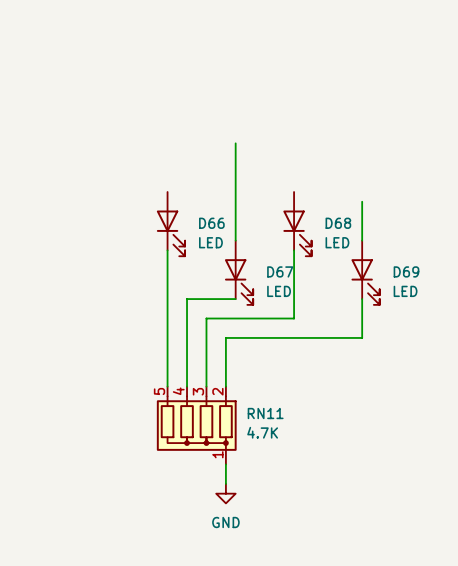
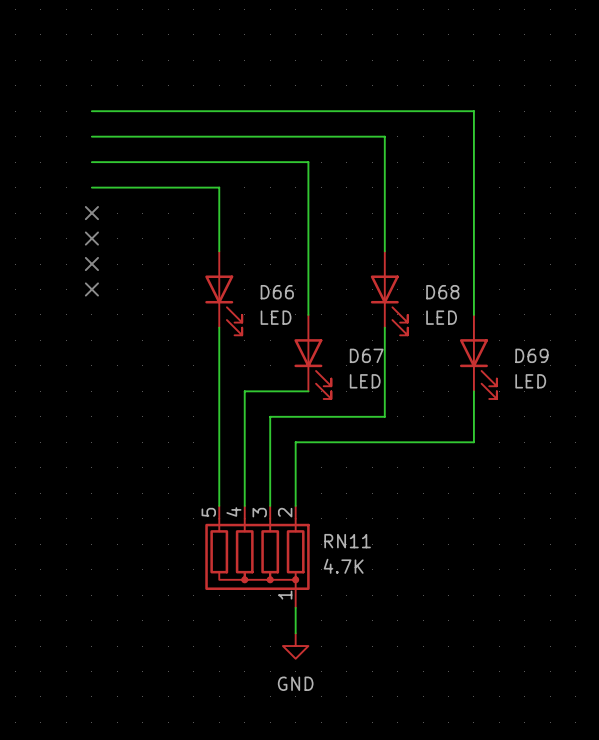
wire: none -> (91, 111) (473, 111) (473, 264)
wire: none -> (91, 136) (384, 136) (384, 251)
wire: none -> (91, 162) (308, 162) (308, 187)
wire: none -> (91, 187) (219, 187) (219, 251)
no-connect mark: none -> (91, 213)
no-connect mark: none -> (91, 238)
no-connect mark: none -> (91, 264)
no-connect mark: none -> (91, 289)

